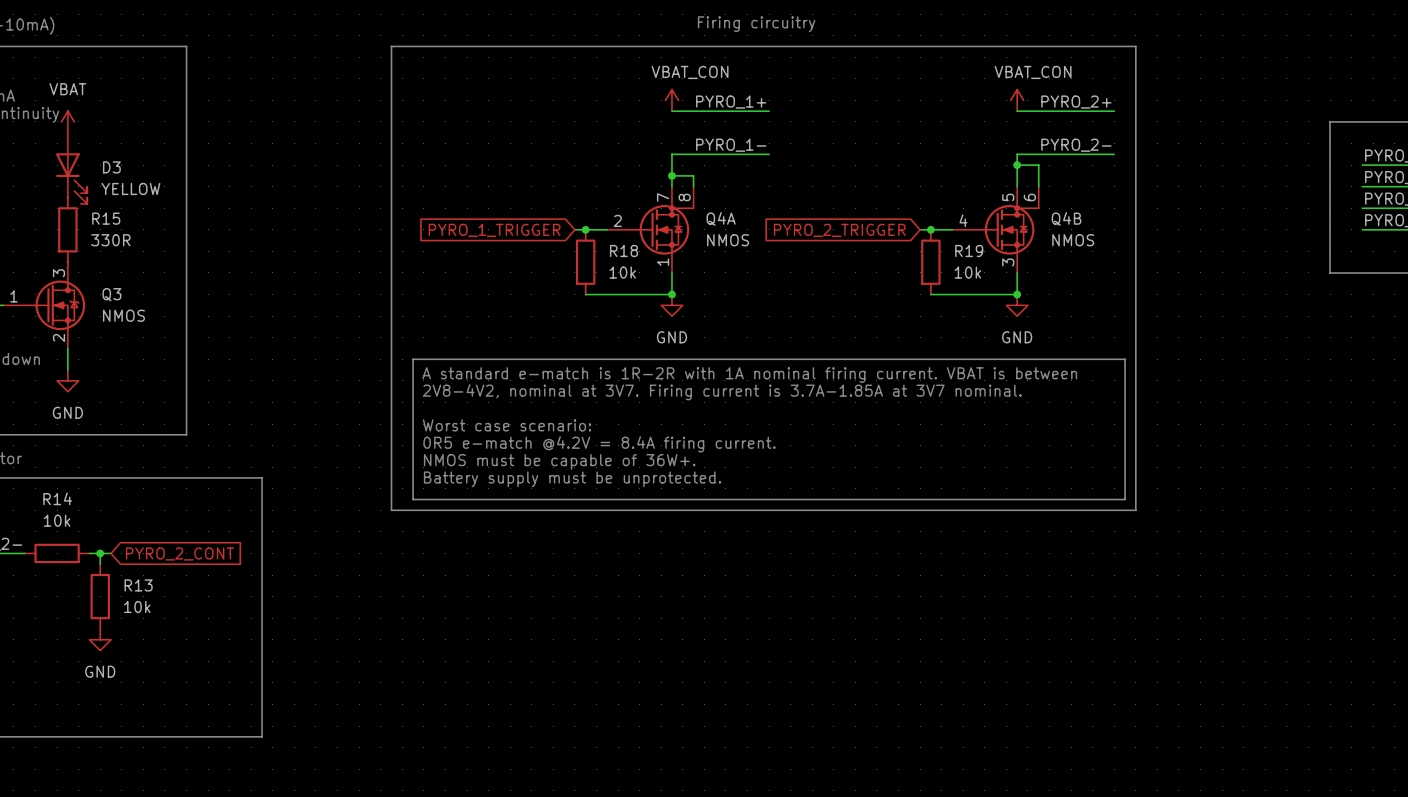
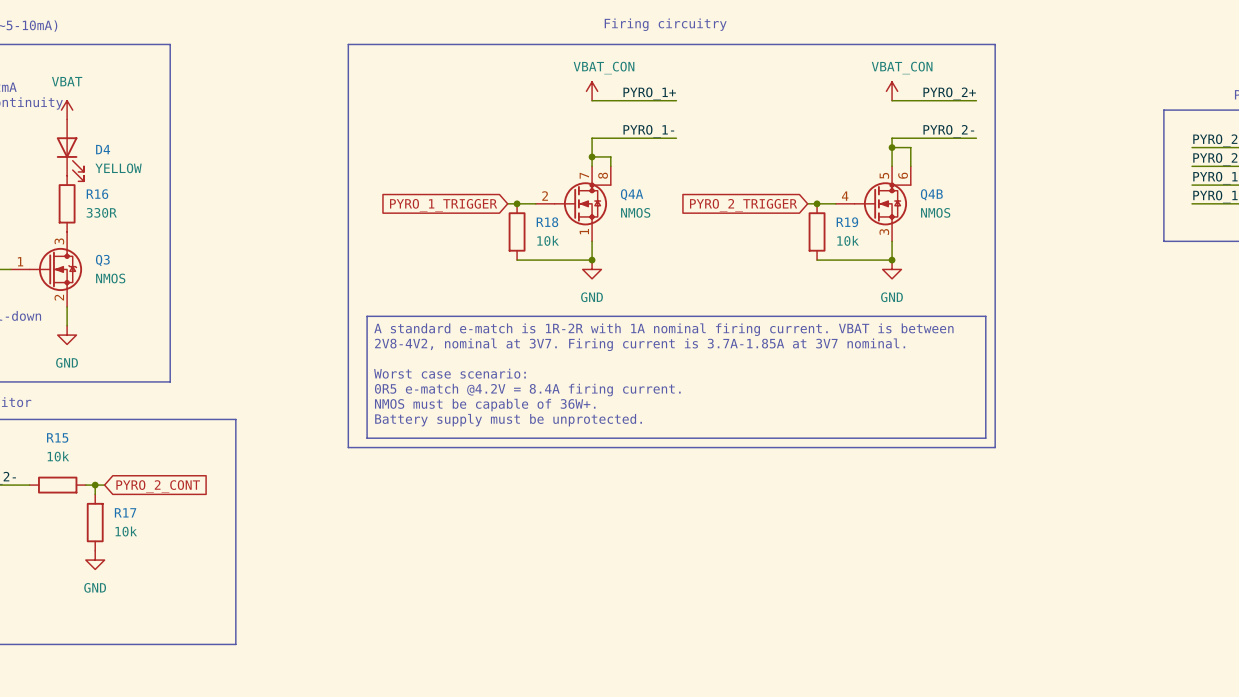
D3 name: D3 (111, 167) -> D4 (103, 149)
R15 name: R15 (106, 218) -> R16 (97, 194)
R14 name: R14 (57, 498) -> R15 (57, 437)
R13 name: R13 (138, 585) -> R17 (125, 512)

